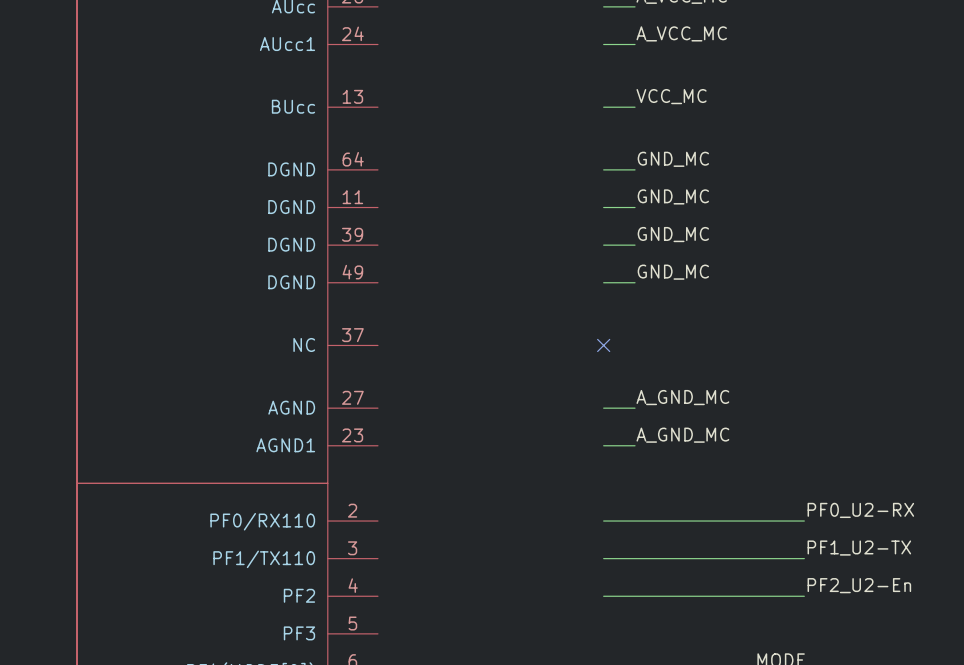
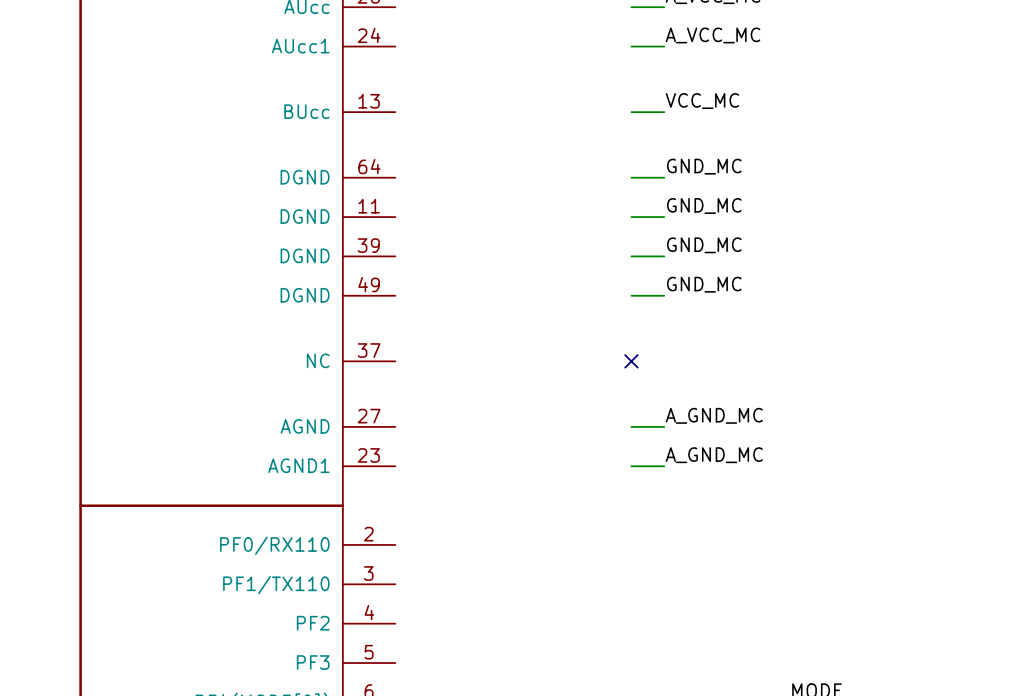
label: PF0_U2-RX (860, 510) -> none
wire: (603, 521) (804, 521) -> none
label: PF1_U2-TX (859, 548) -> none
wire: (603, 558) (804, 558) -> none
label: PF2_U2-En (859, 585) -> none
wire: (603, 596) (804, 596) -> none

